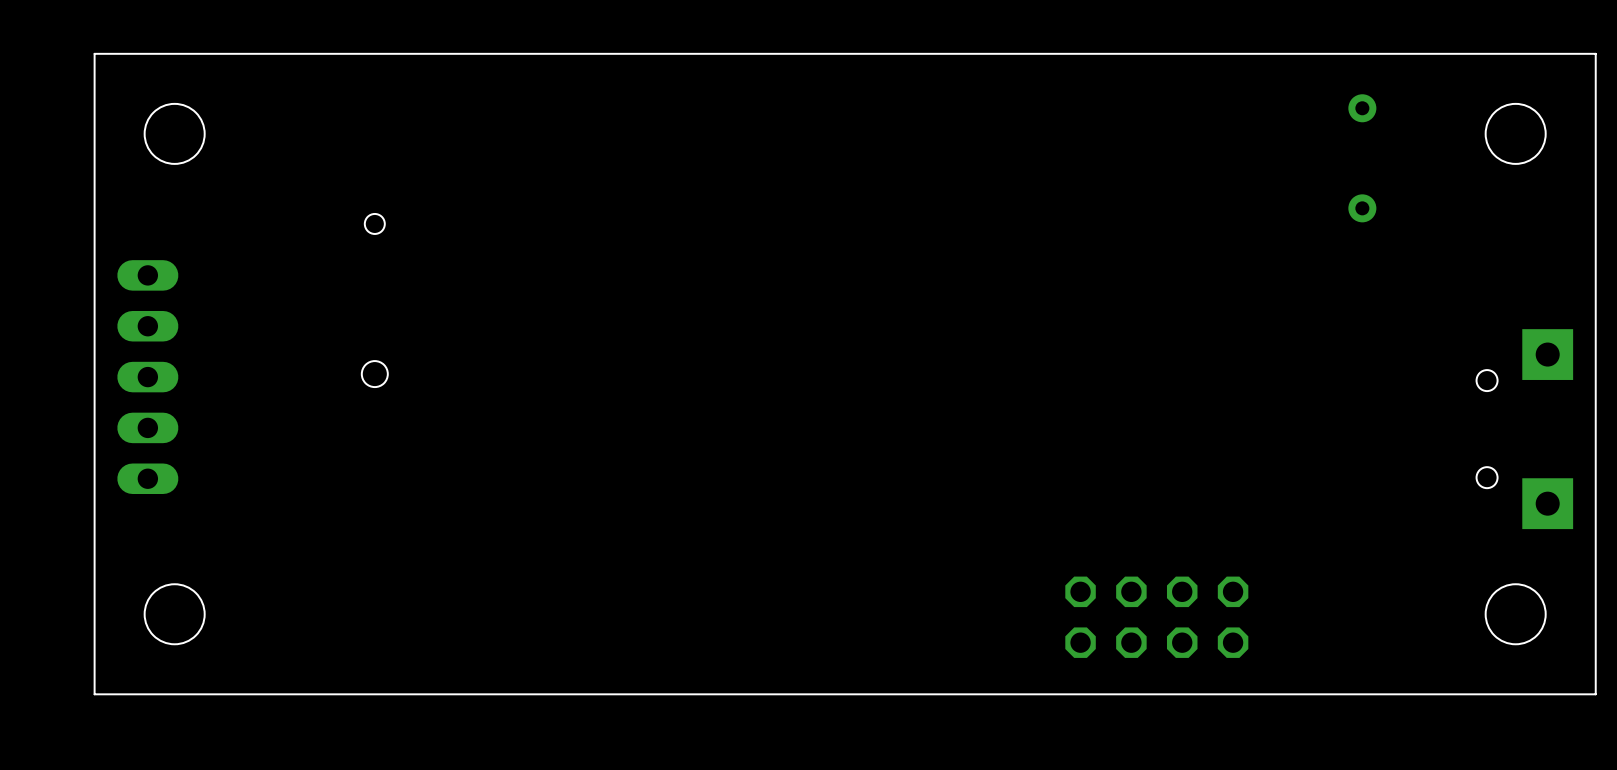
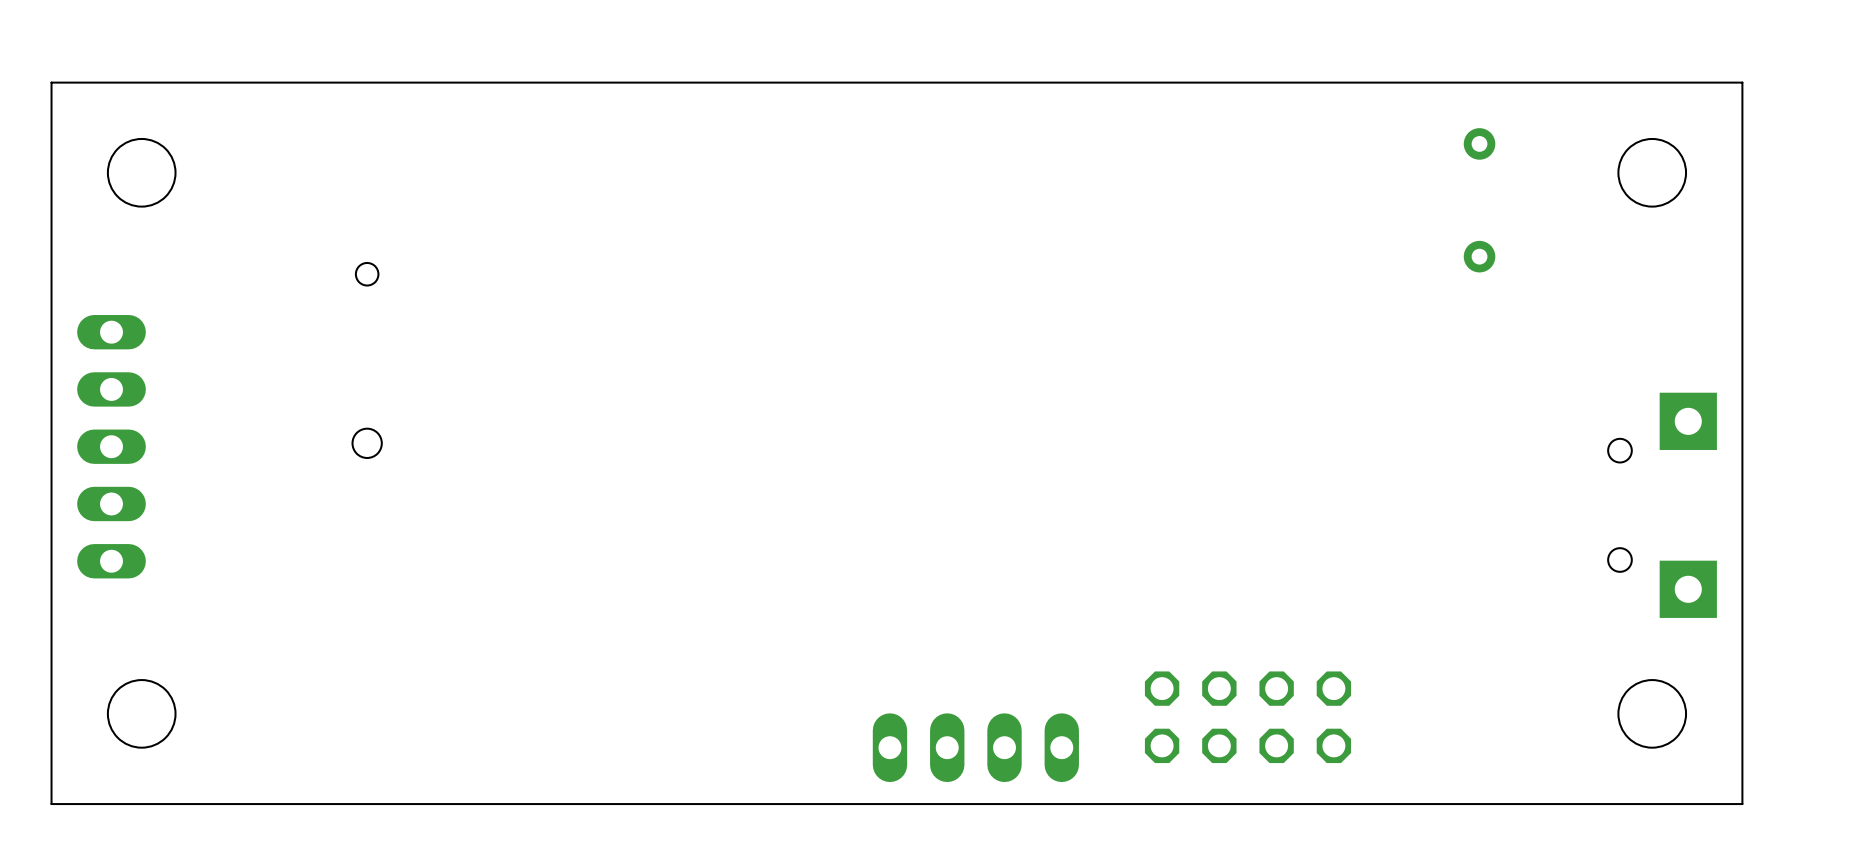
part: none -> (975, 747)

